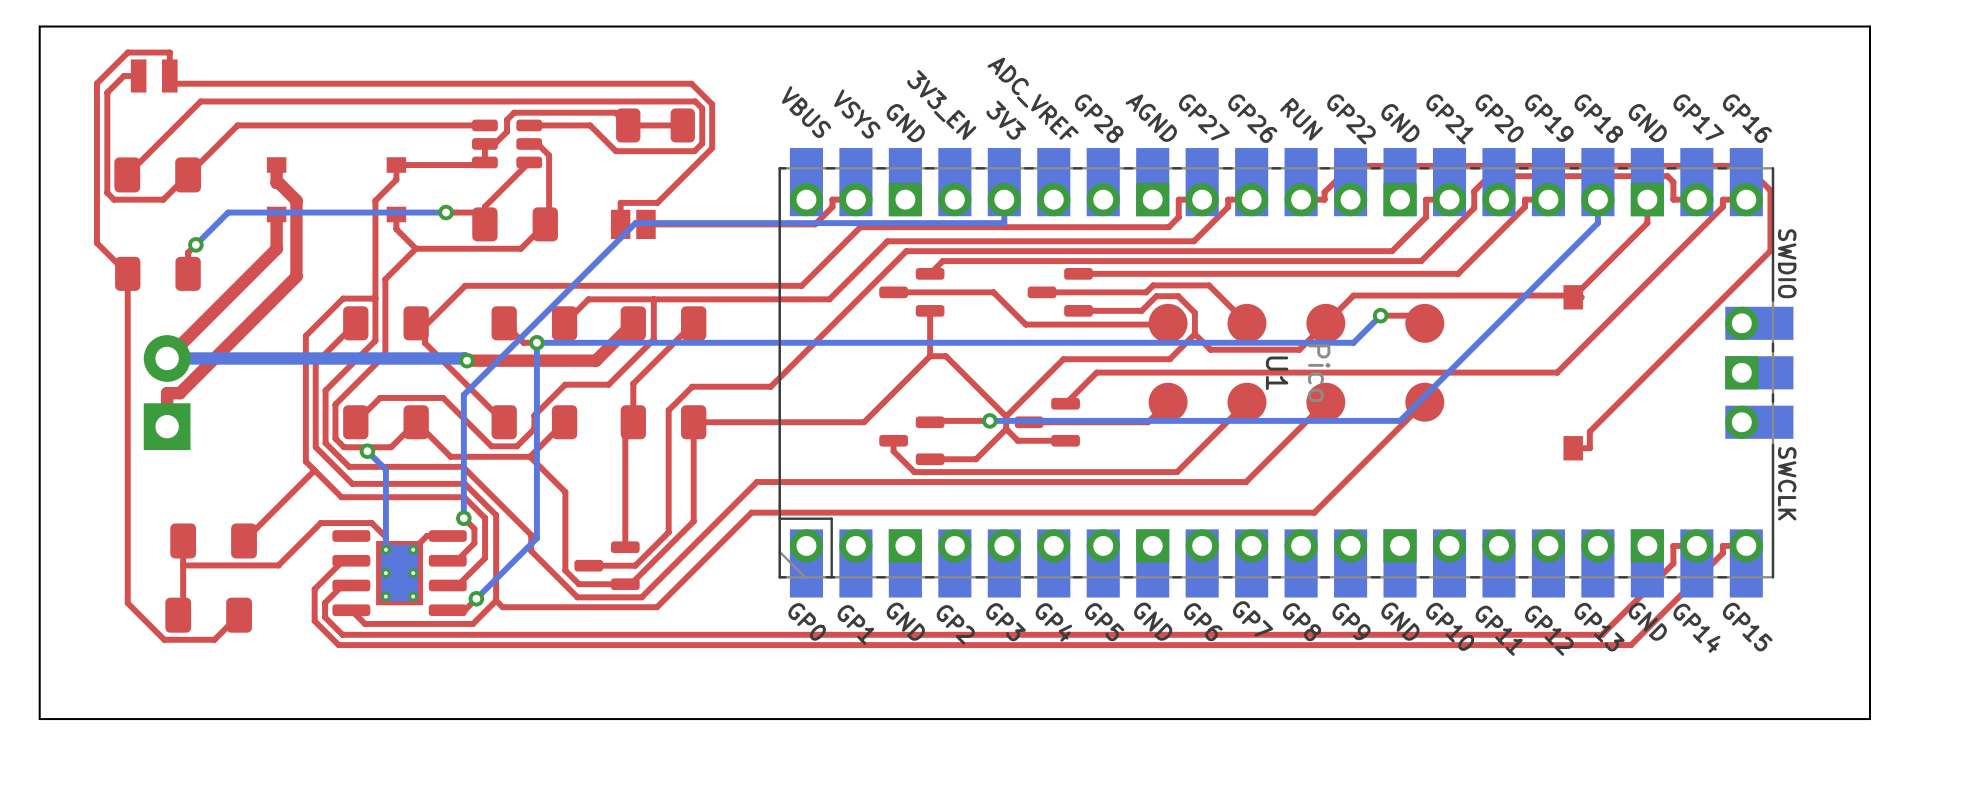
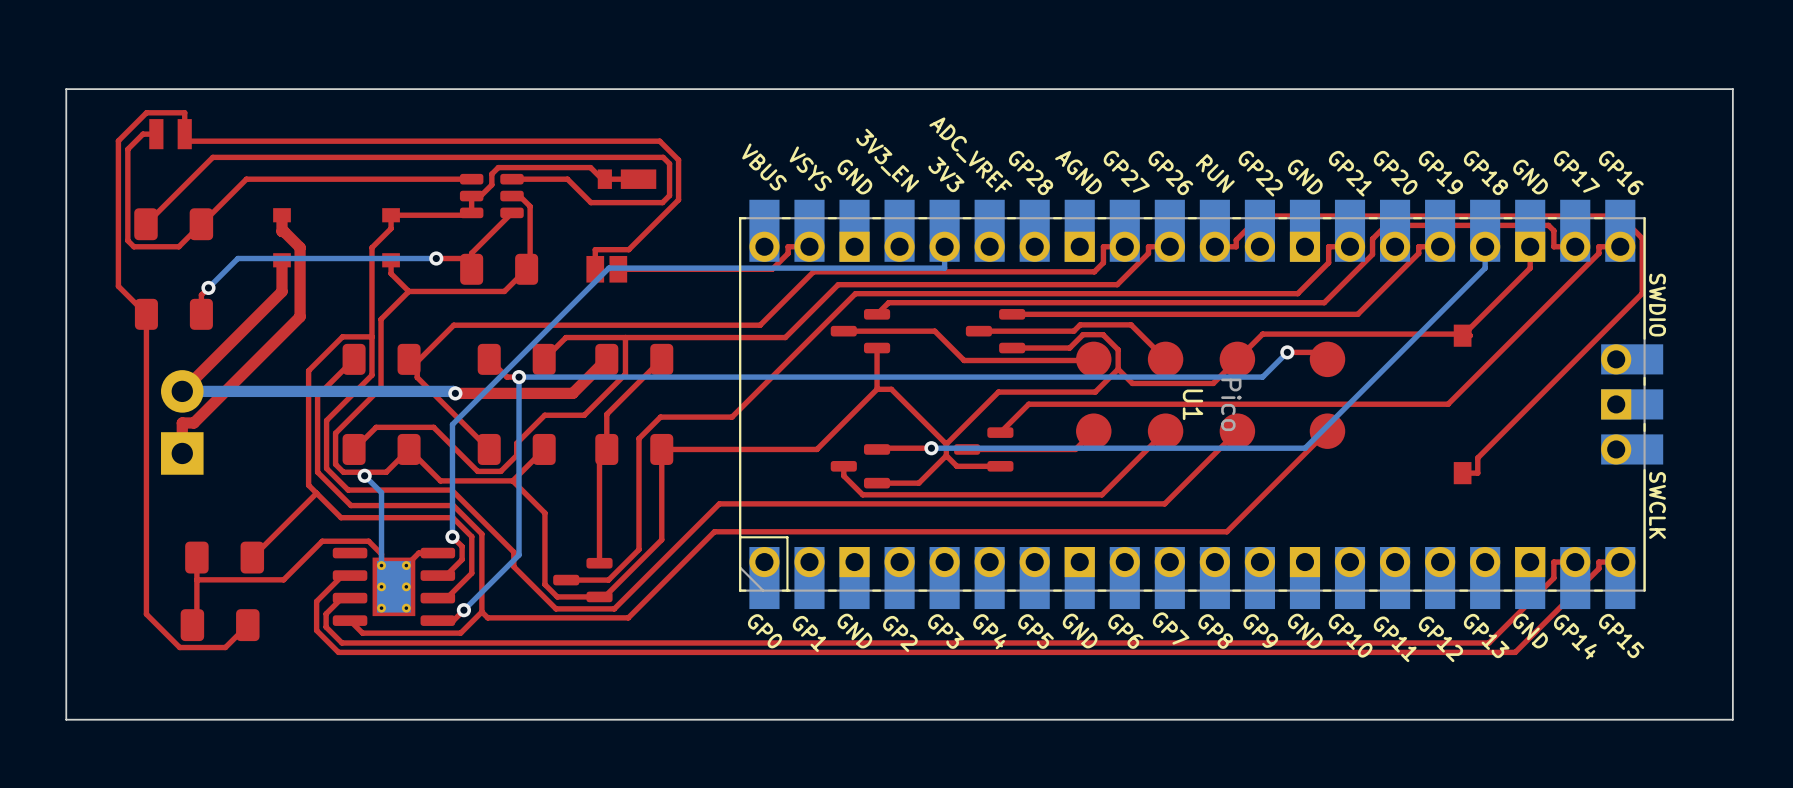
part footprint: [616, 108, 695, 143] -> [597, 169, 657, 189]

